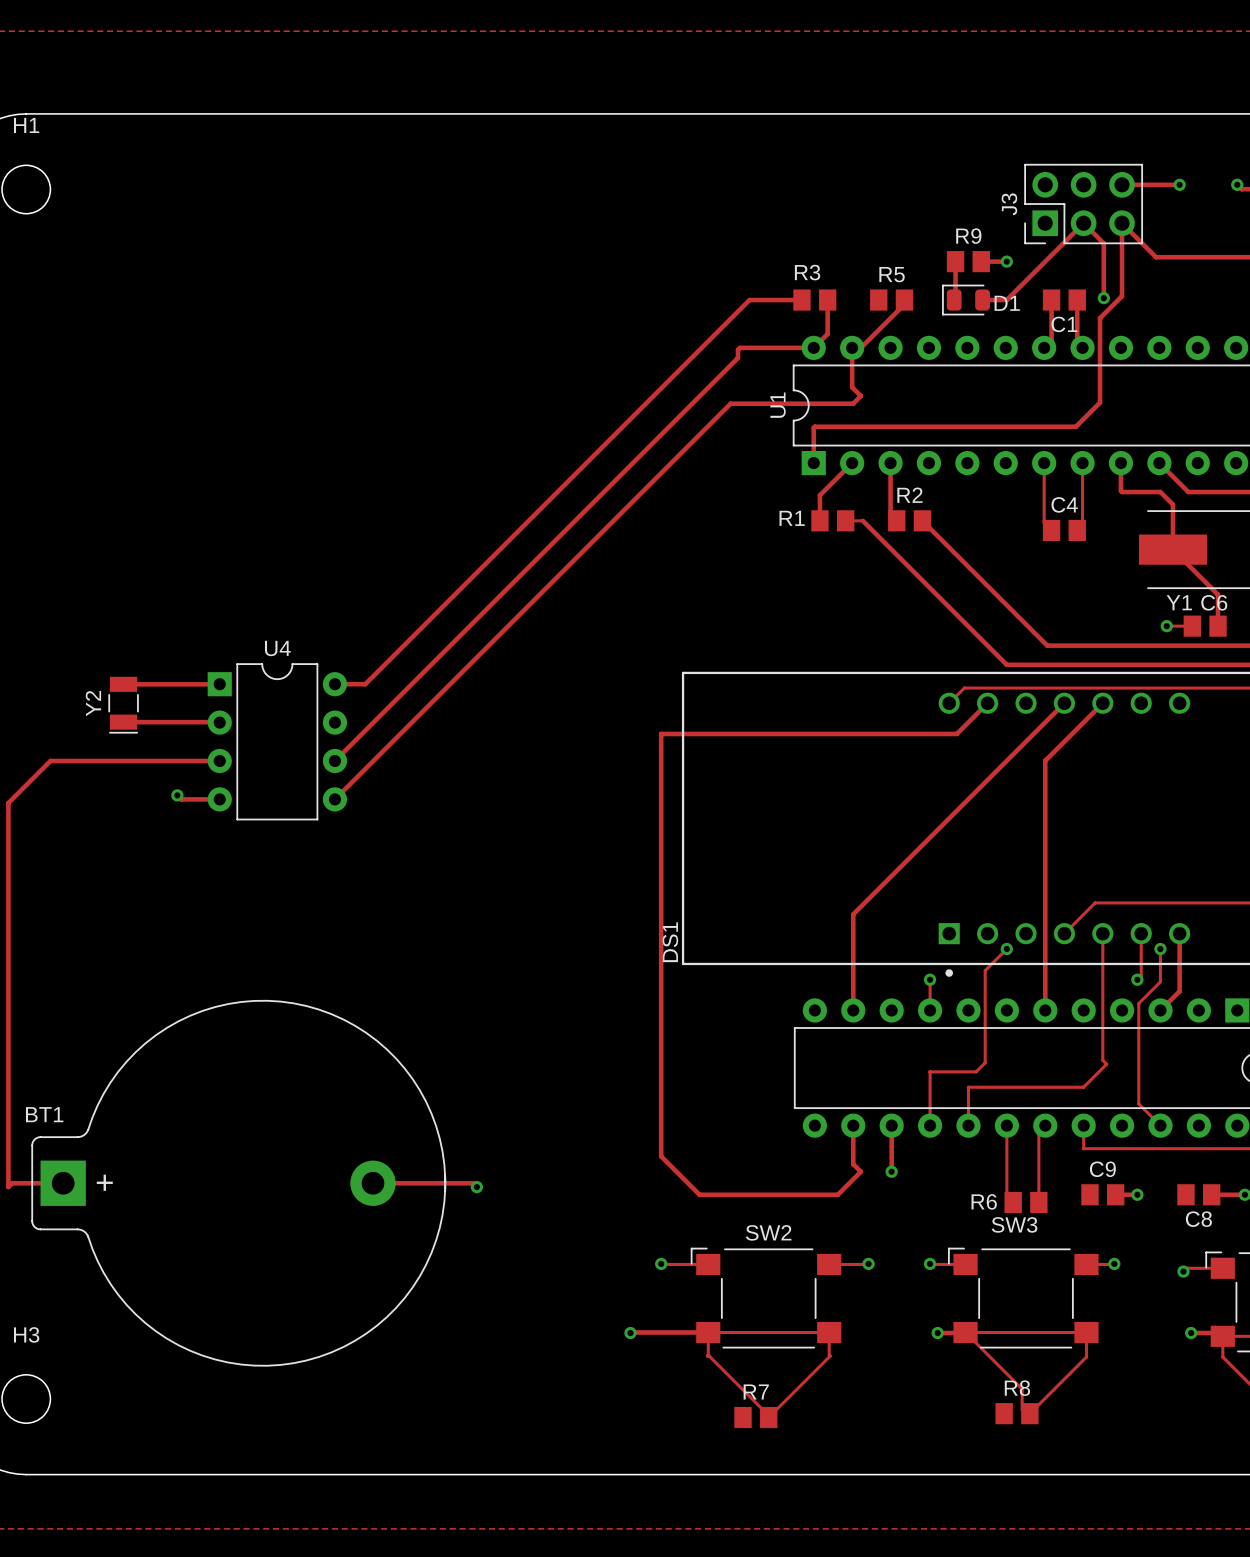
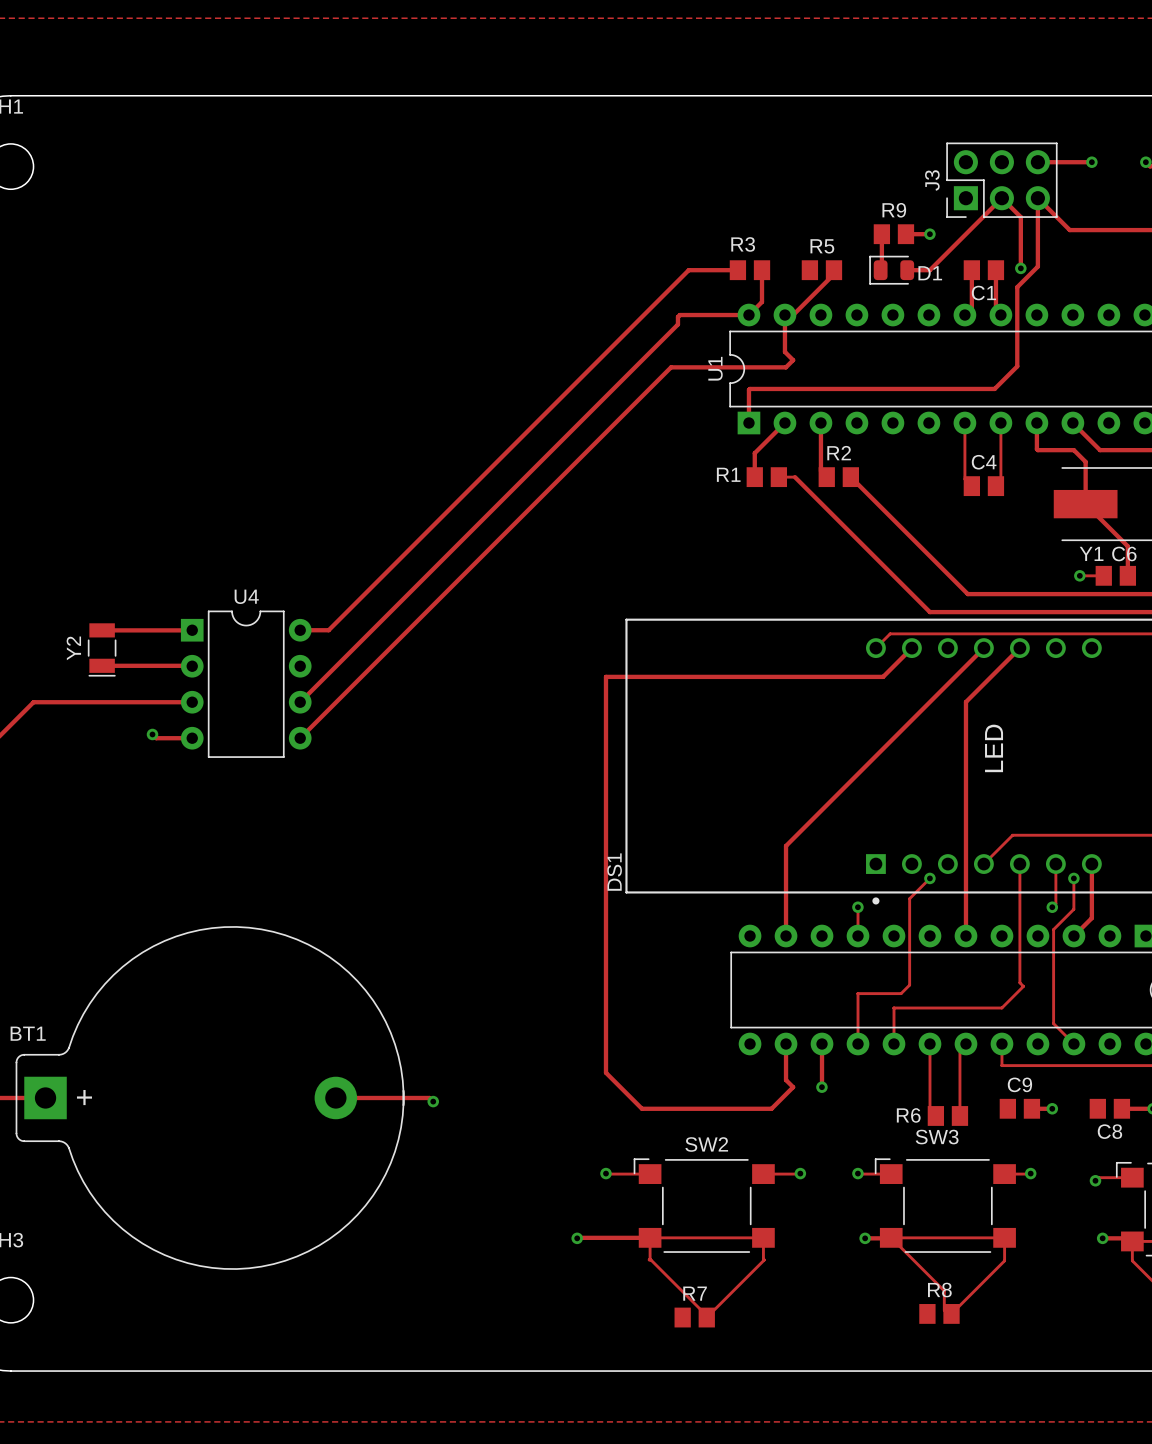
DS1 value: none -> LED (994, 748)

